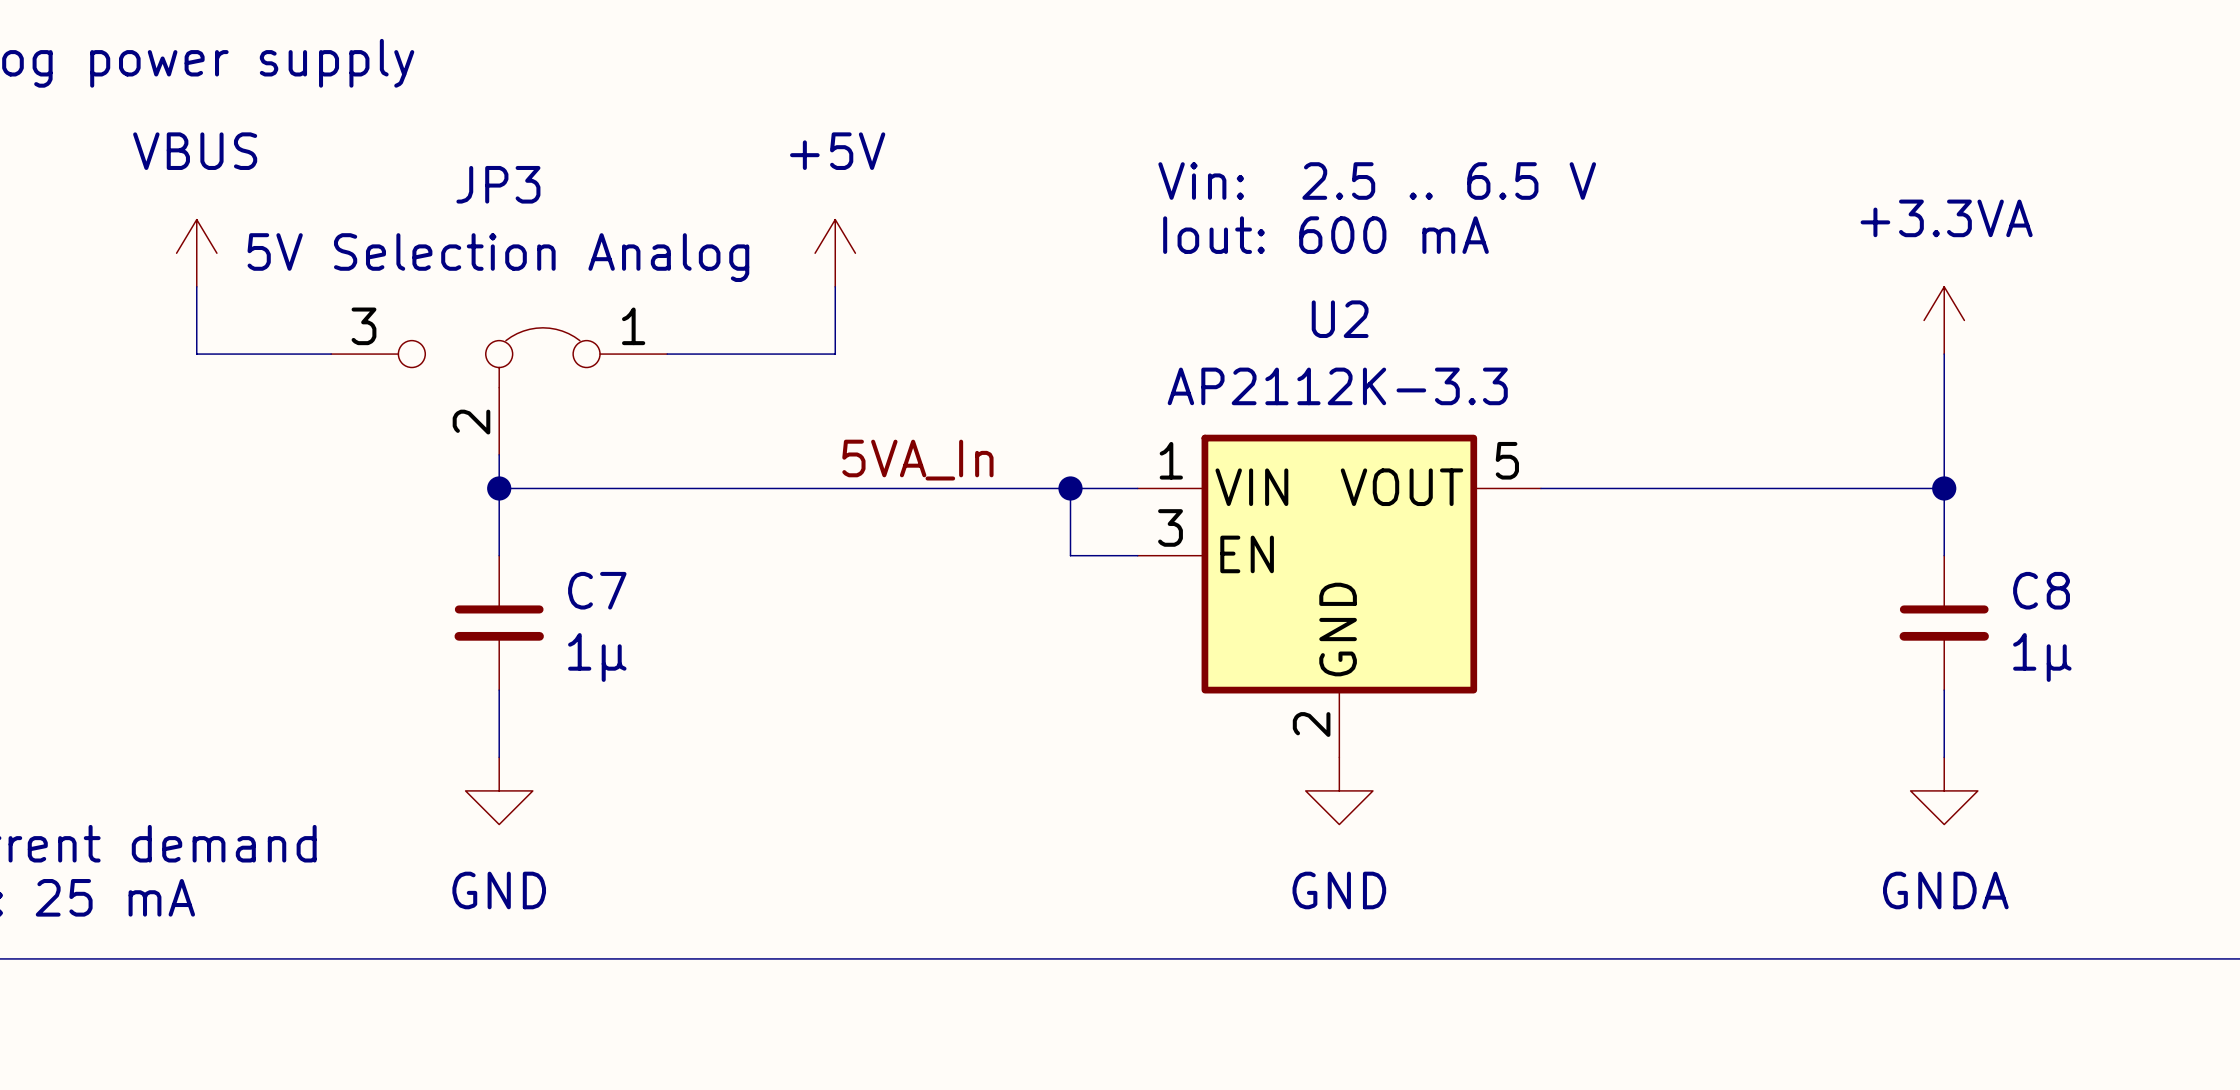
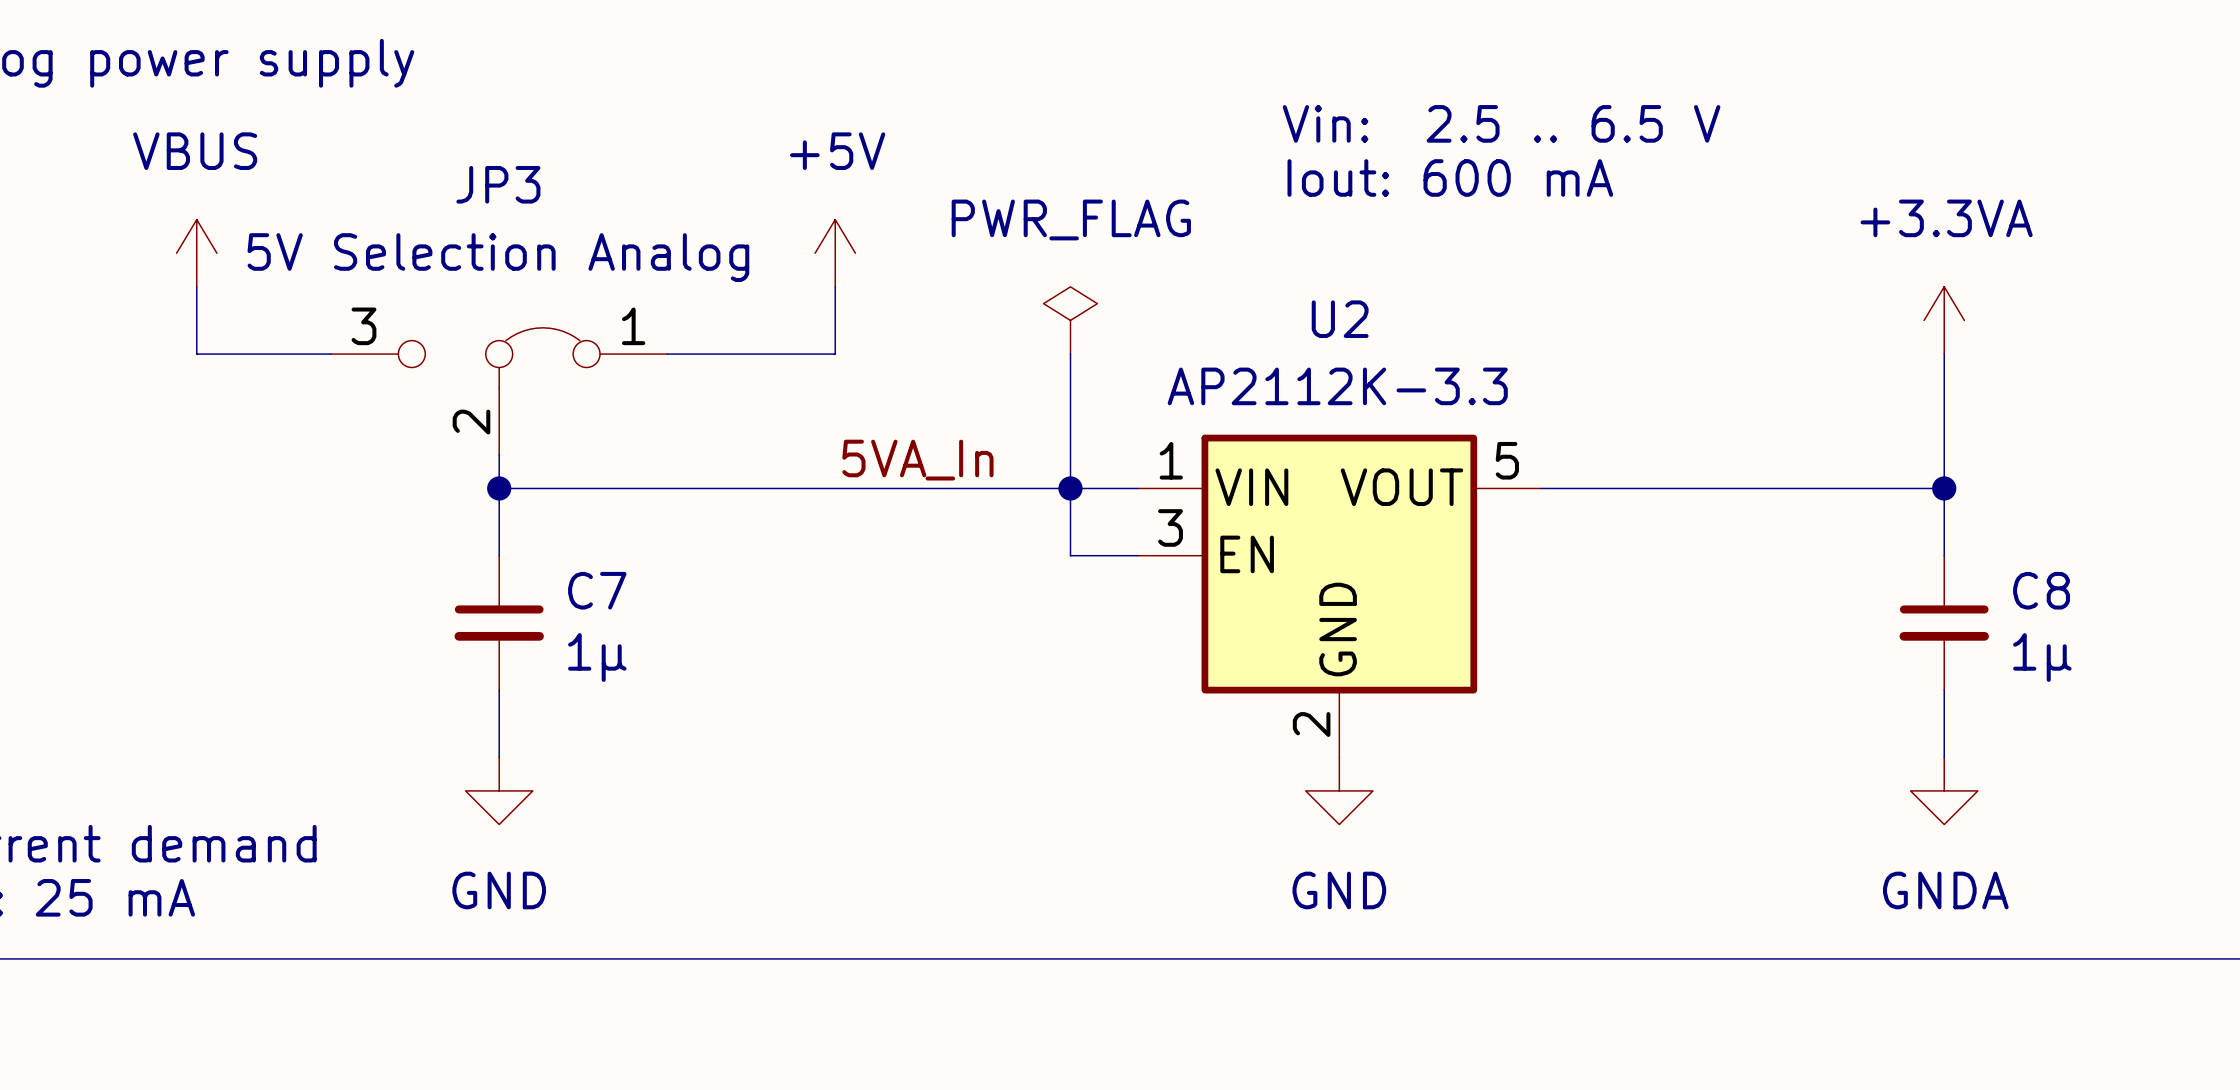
text position: Vin: 2.5 .. 6.5 V (1377, 181) -> Vin: 2.5 .. 6.5 V (1501, 123)
text position: Iout: 600 mA (1325, 235) -> Iout: 600 mA (1450, 177)
power symbol: none -> PWR_FLAG (1070, 320)
wire: none -> (1070, 354) (1070, 488)

